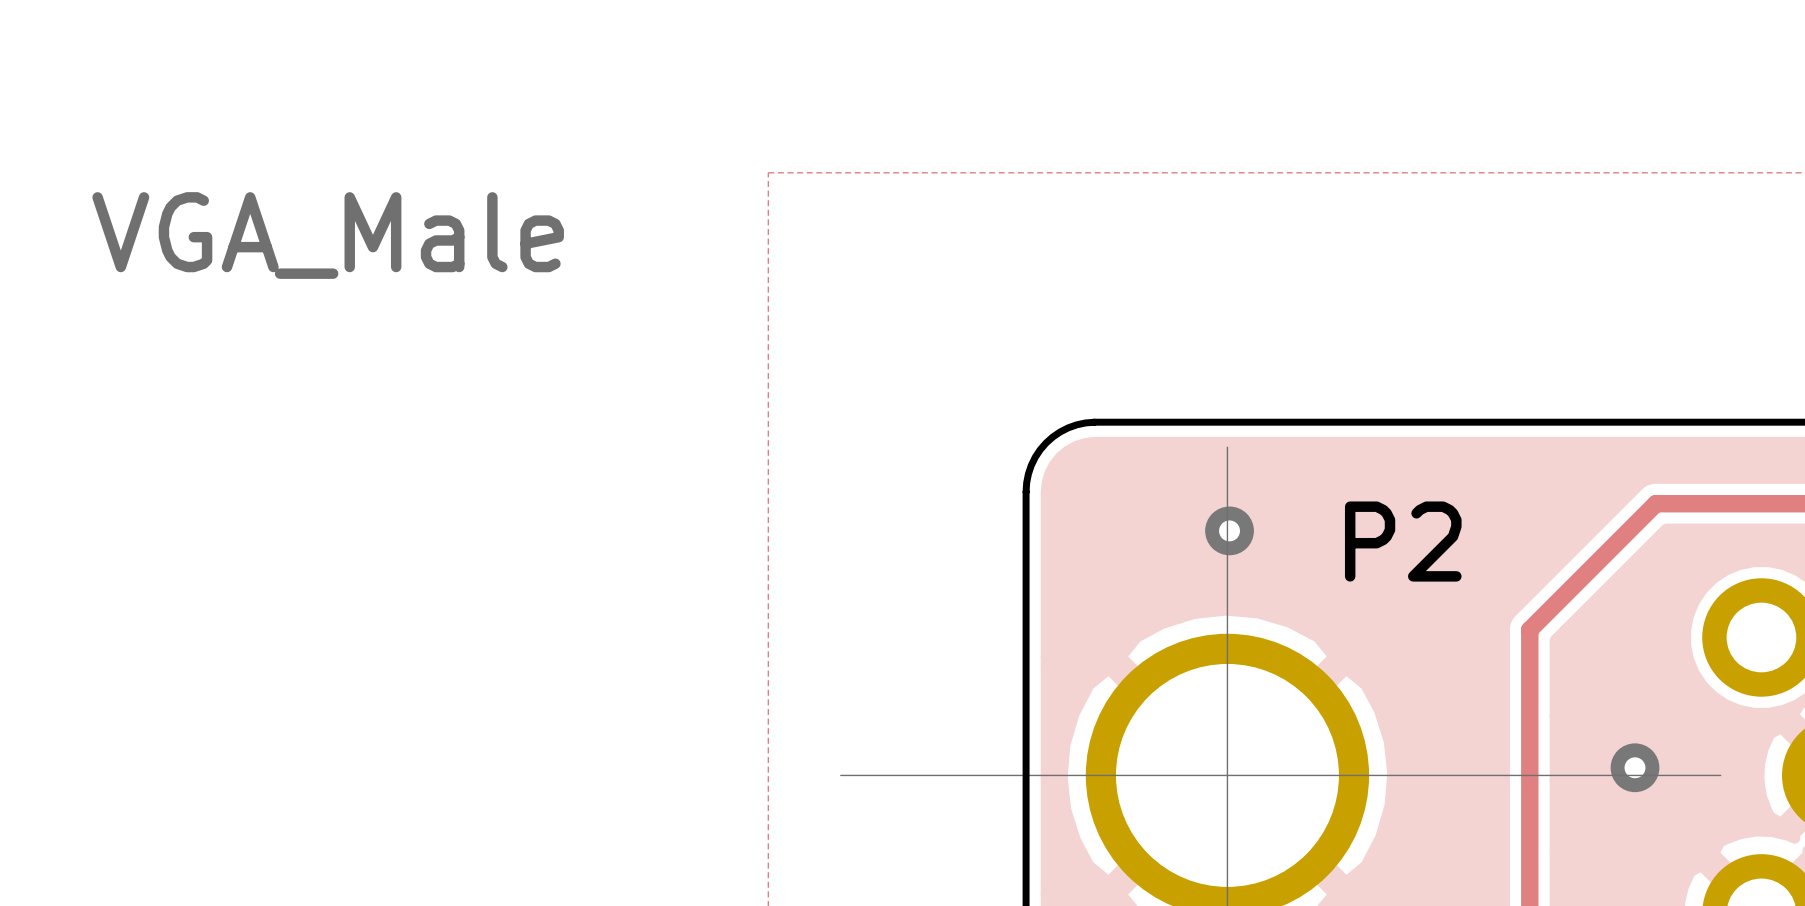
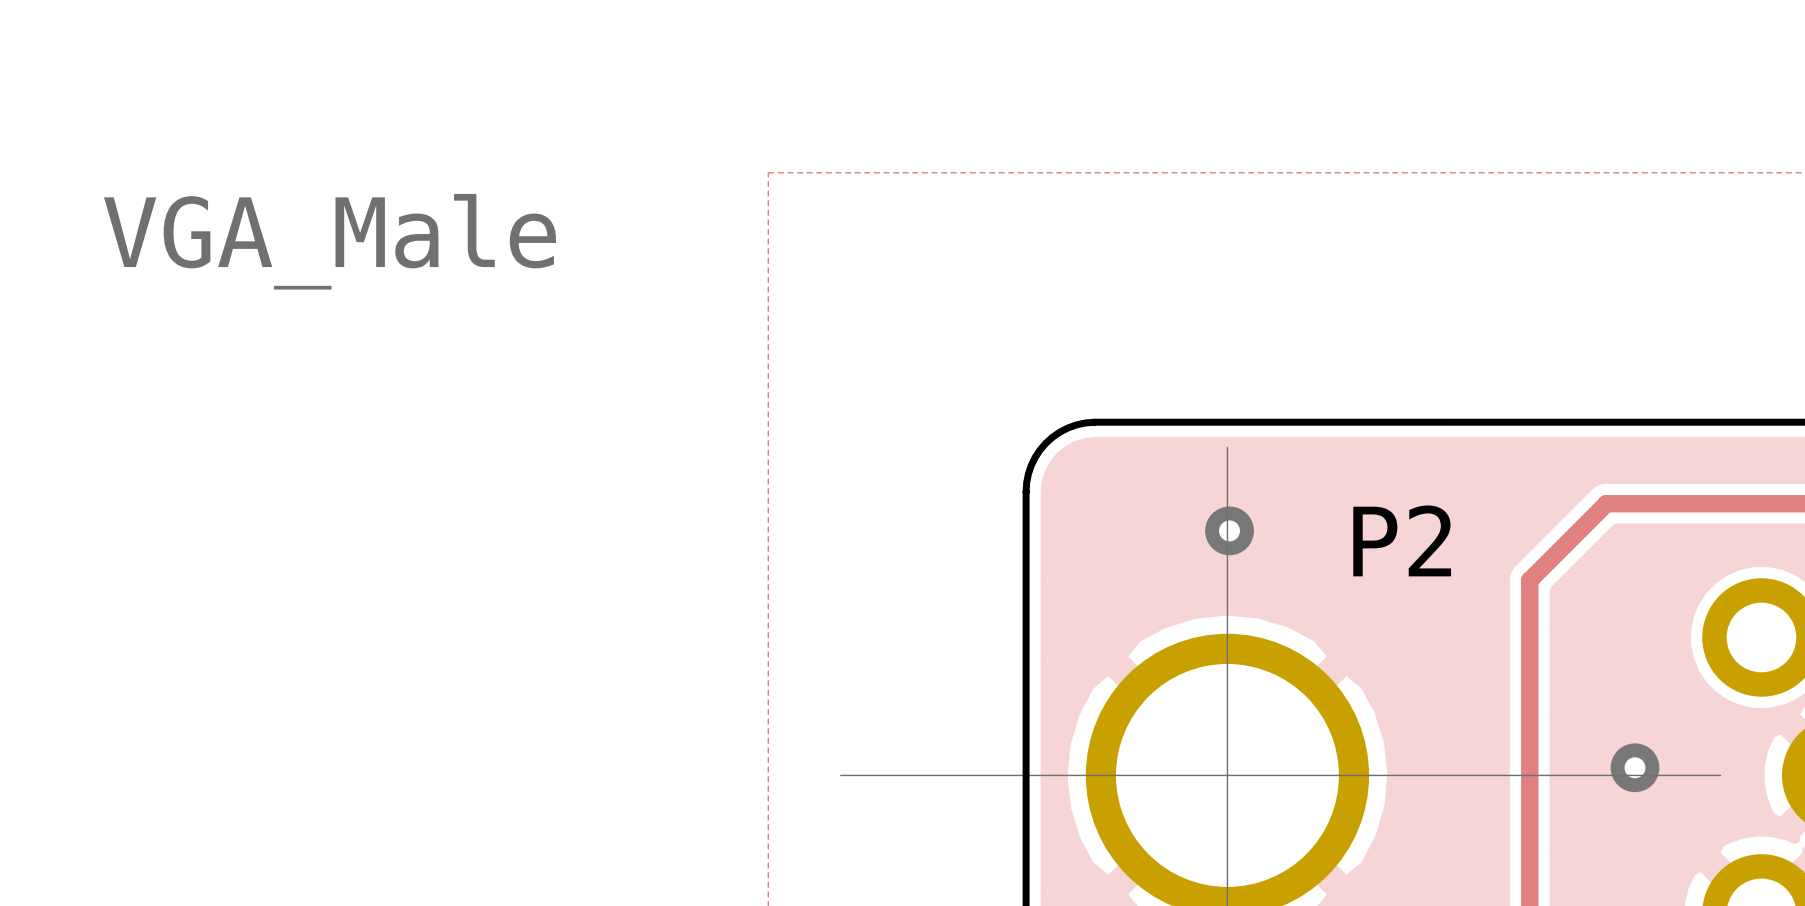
track: (1655, 503) (1529, 629) -> (1655, 503) (1606, 503) (1529, 580) (1529, 629)

